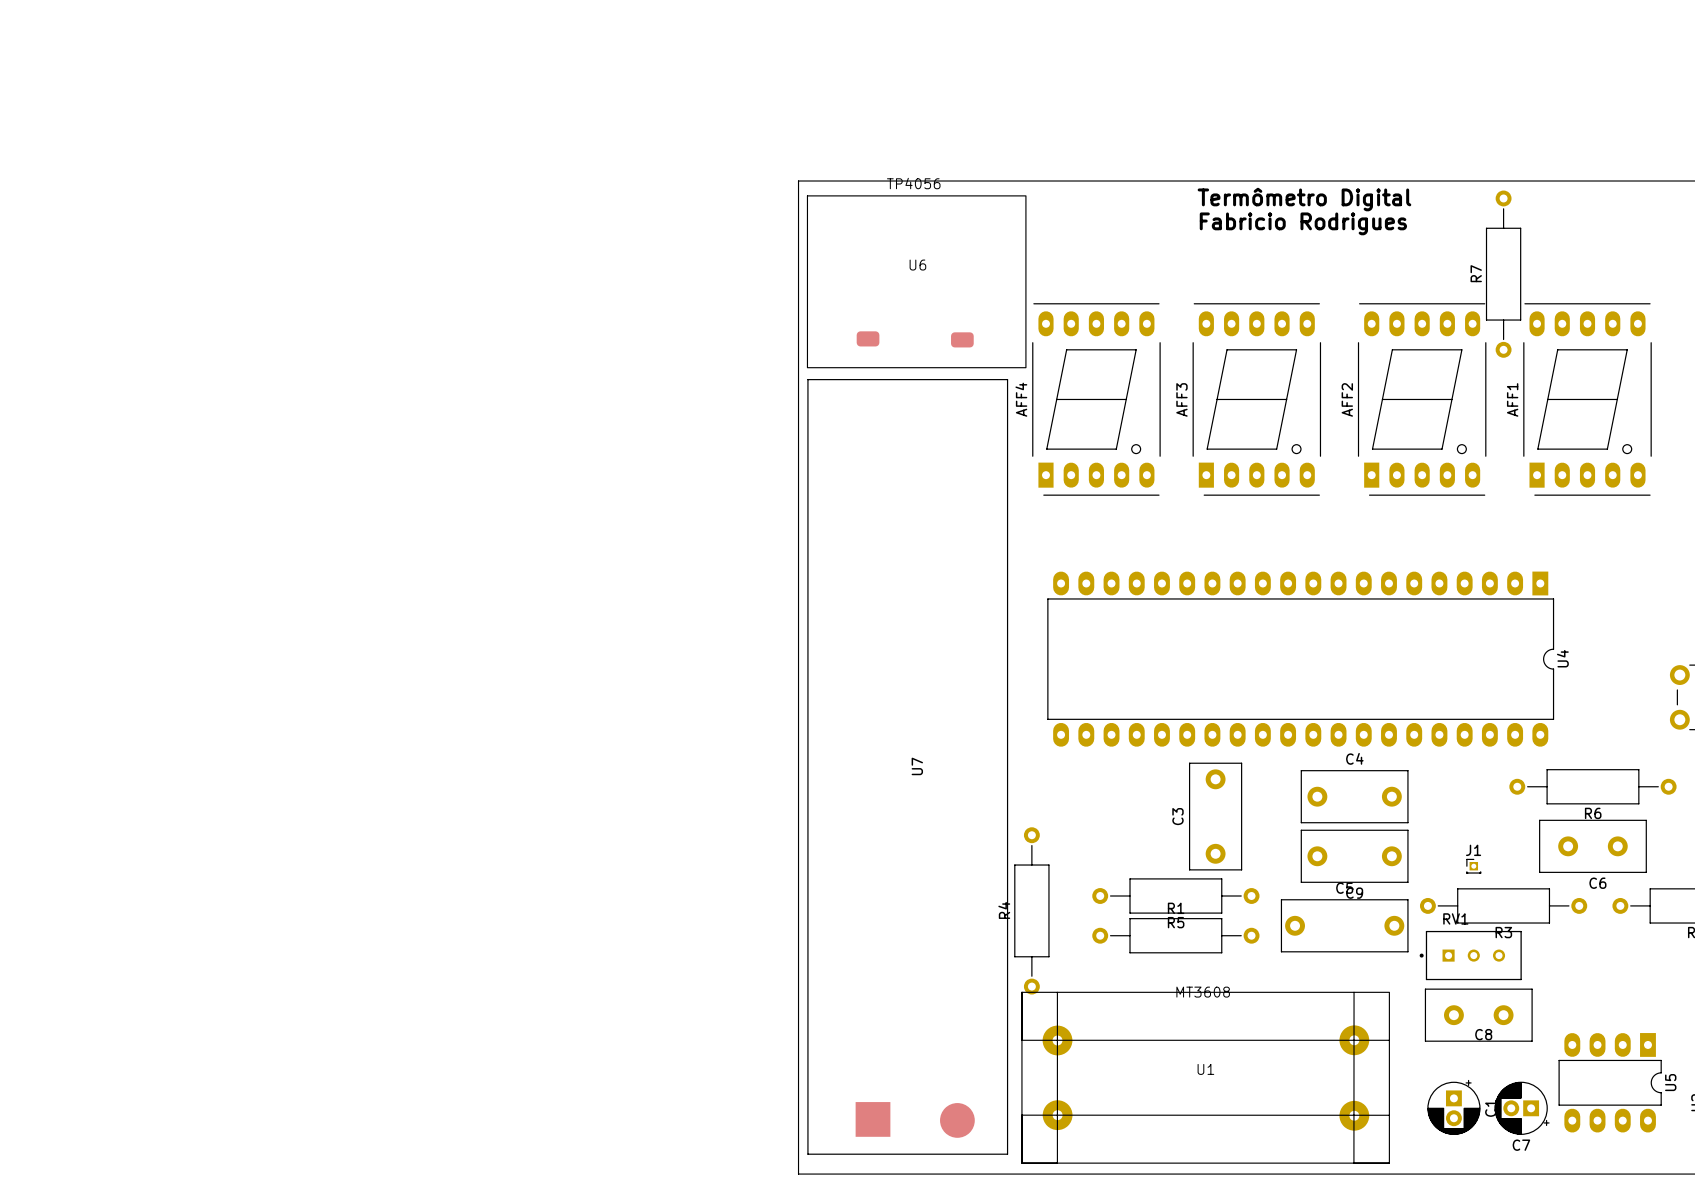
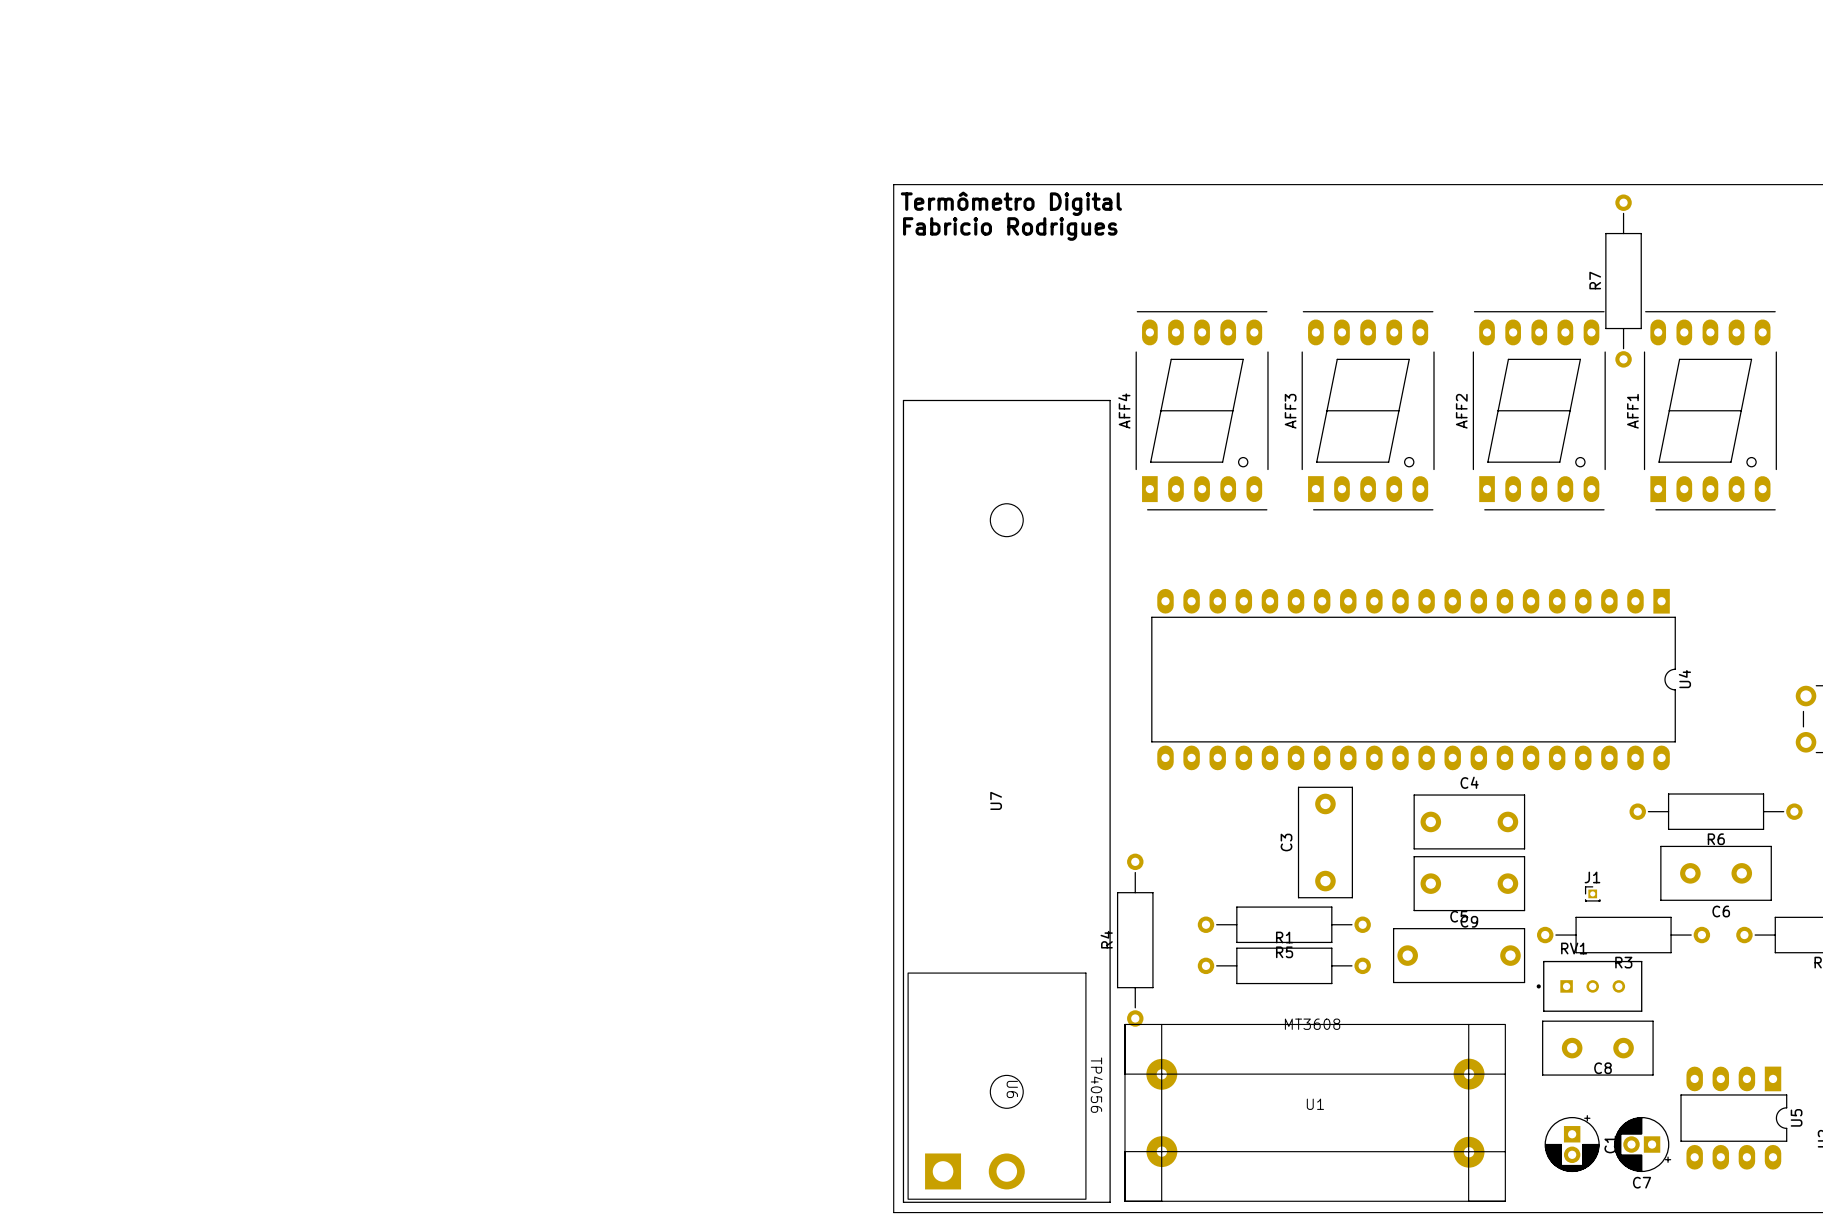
U6 footprint: [806, 195, 1027, 369] -> [907, 972, 1087, 1200]
text: none -> Termômetro Digital (1011, 203)
text: Termômetro Digital (1304, 199) -> none
text: none -> Fabricio Rodrigues (1010, 228)
text: Fabricio Rodrigues (1303, 223) -> none
U6 name position: U6 (917, 265) -> U6 (1012, 1089)
U7 footprint: [807, 379, 1009, 1155] -> [902, 399, 1111, 1203]

